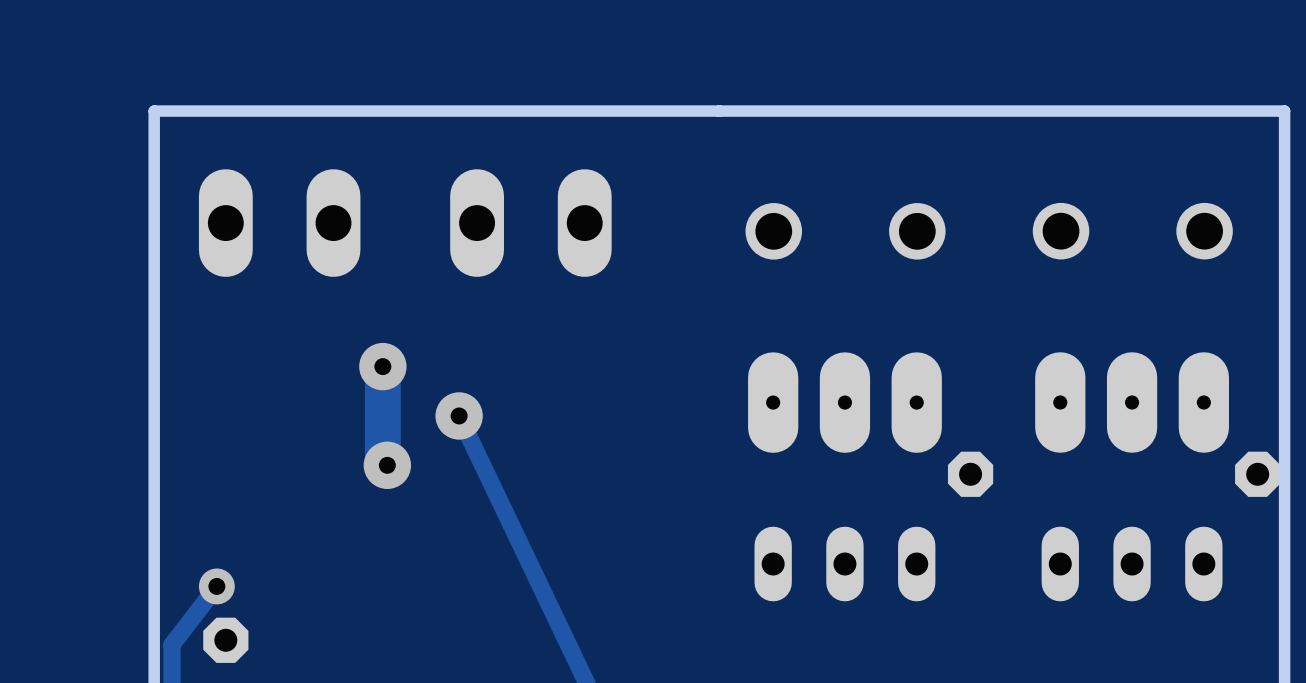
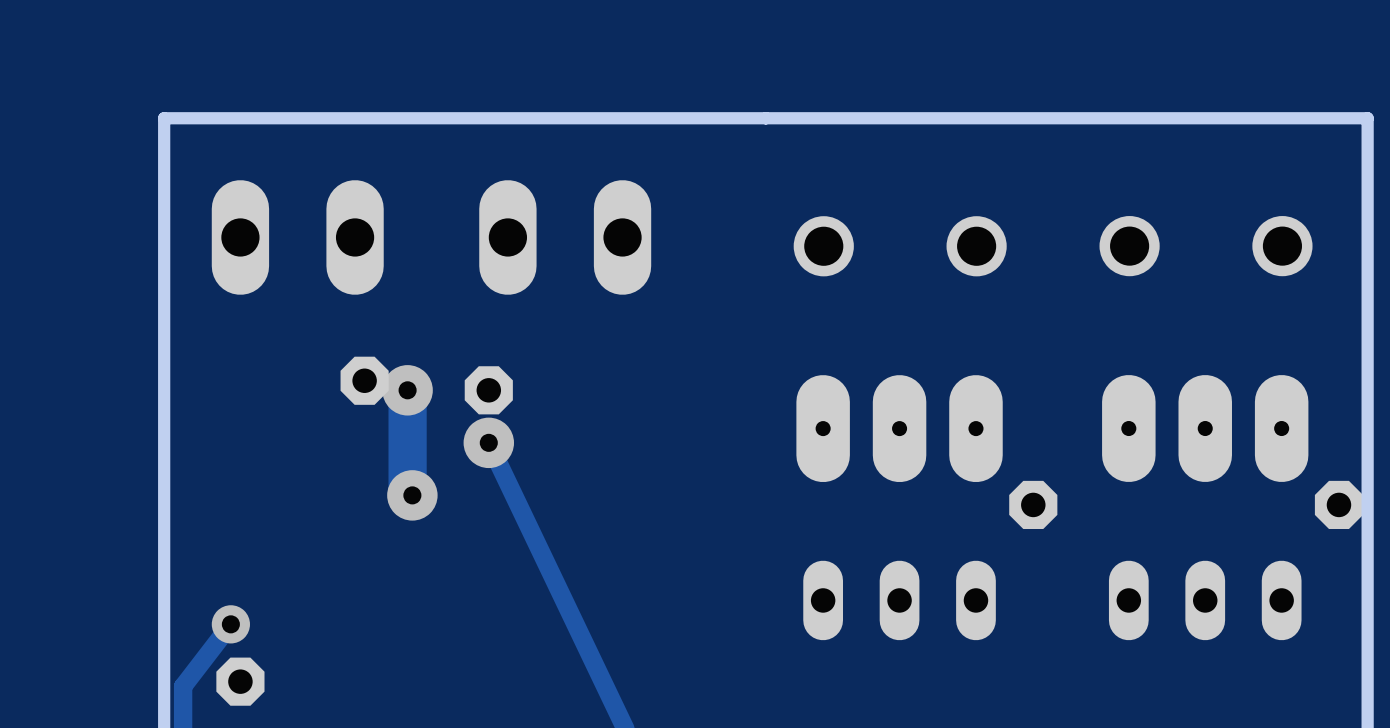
part: none -> (364, 380)
part: none -> (488, 390)

